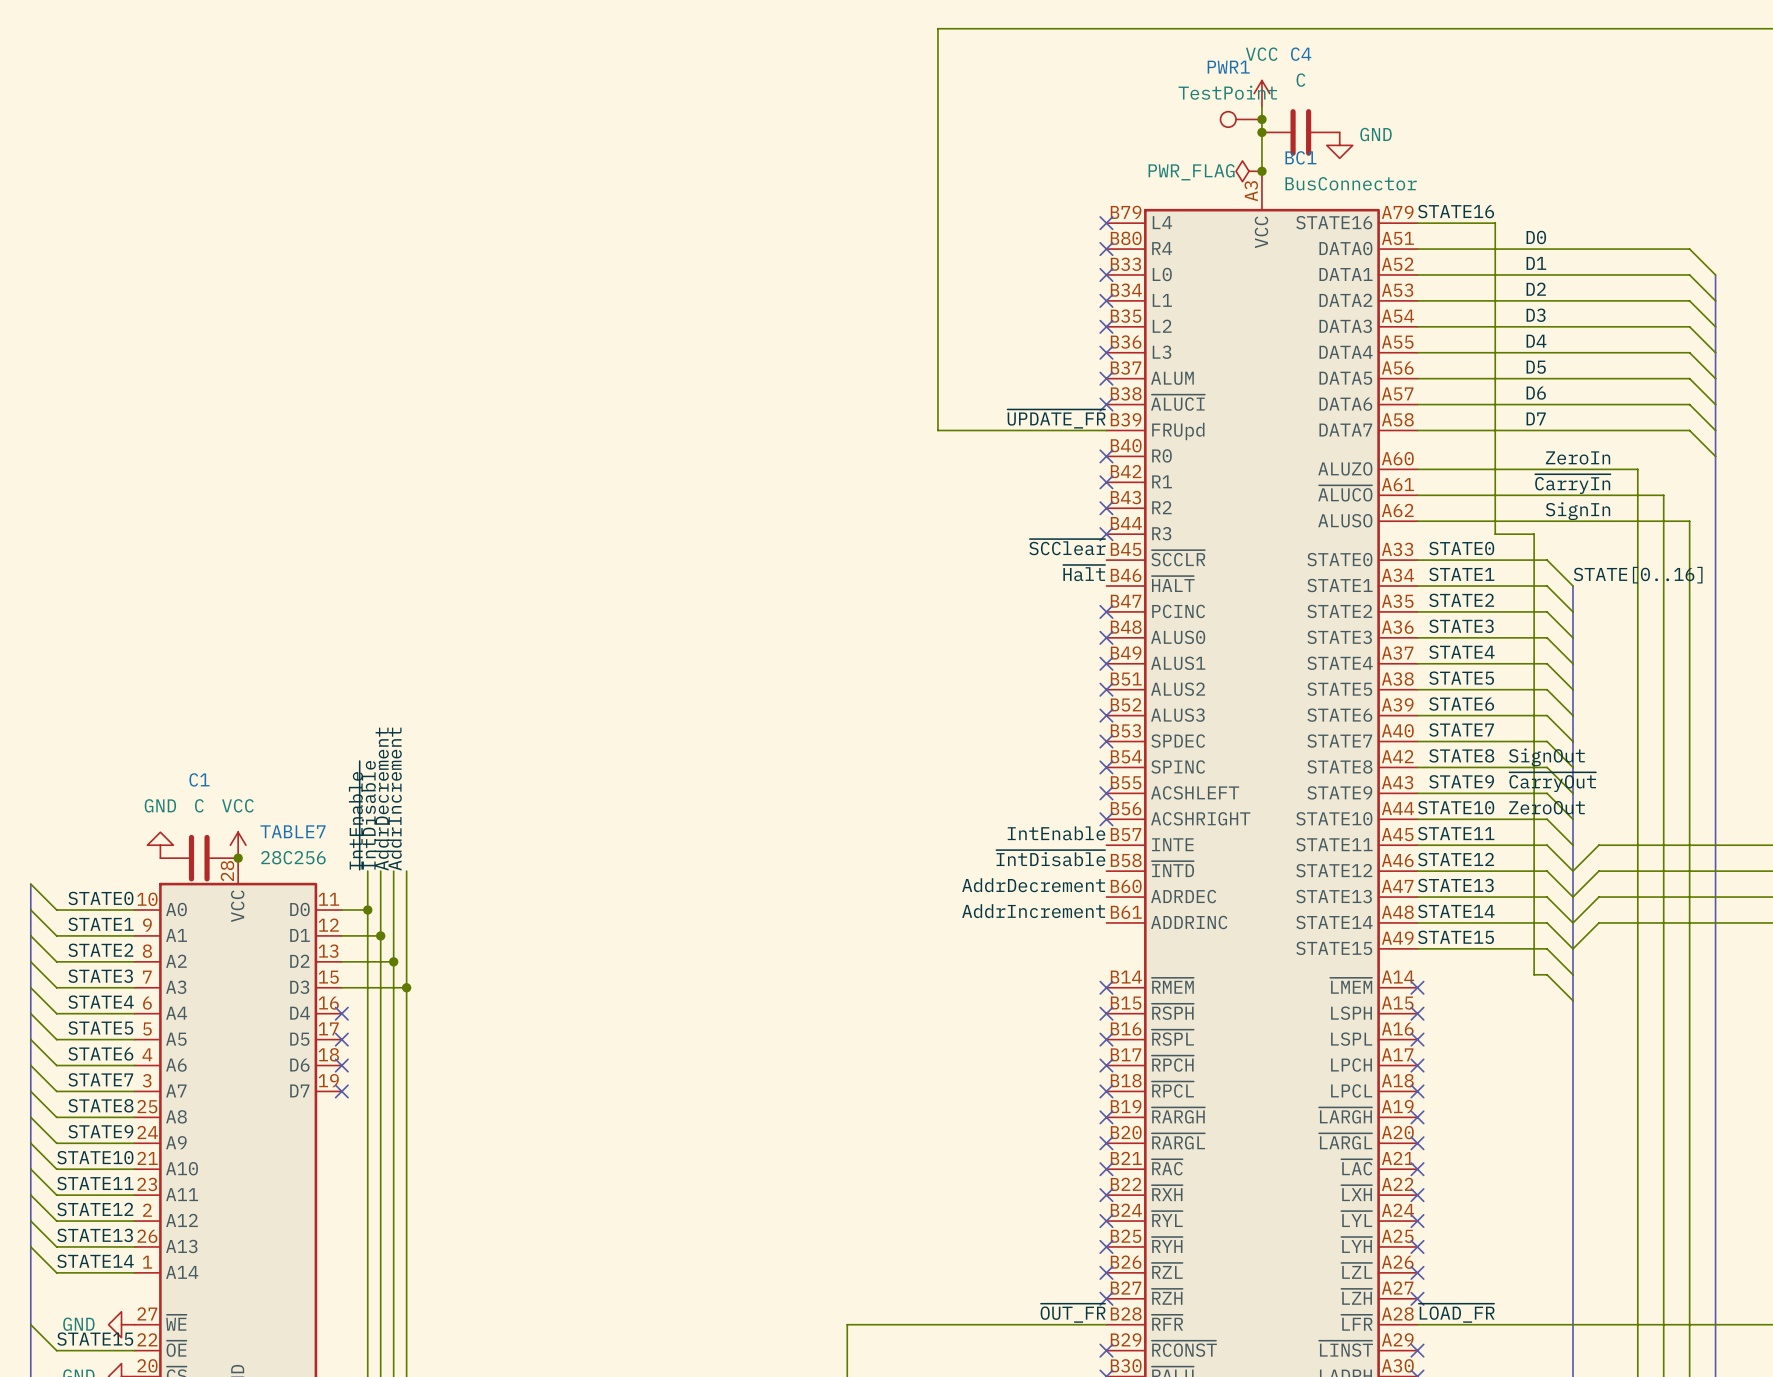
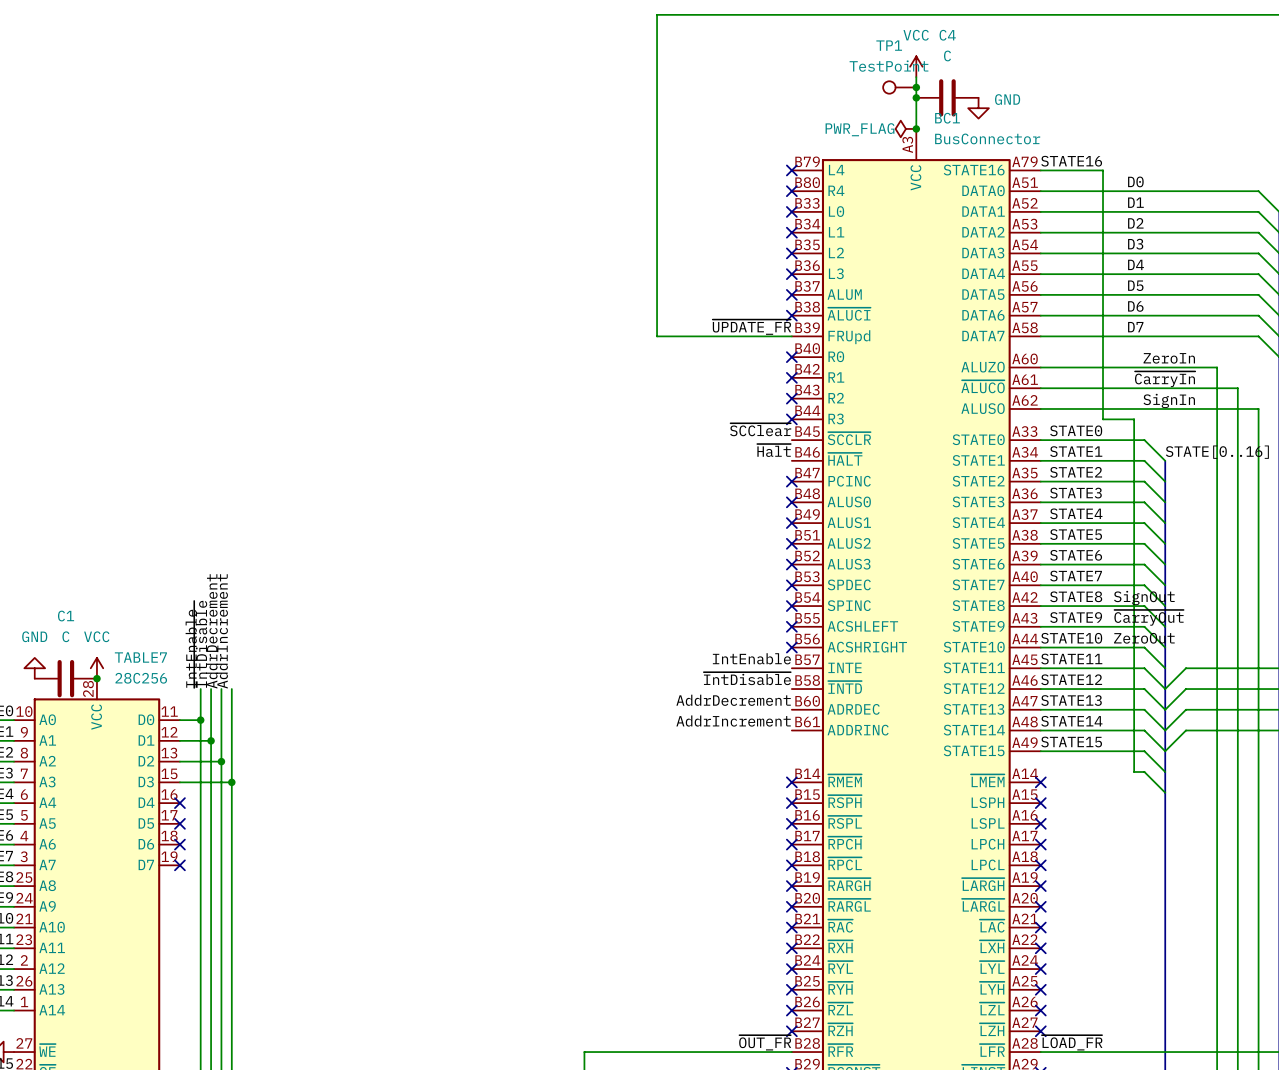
PWR1 name: PWR1 (1228, 67) -> TP1 (889, 45)

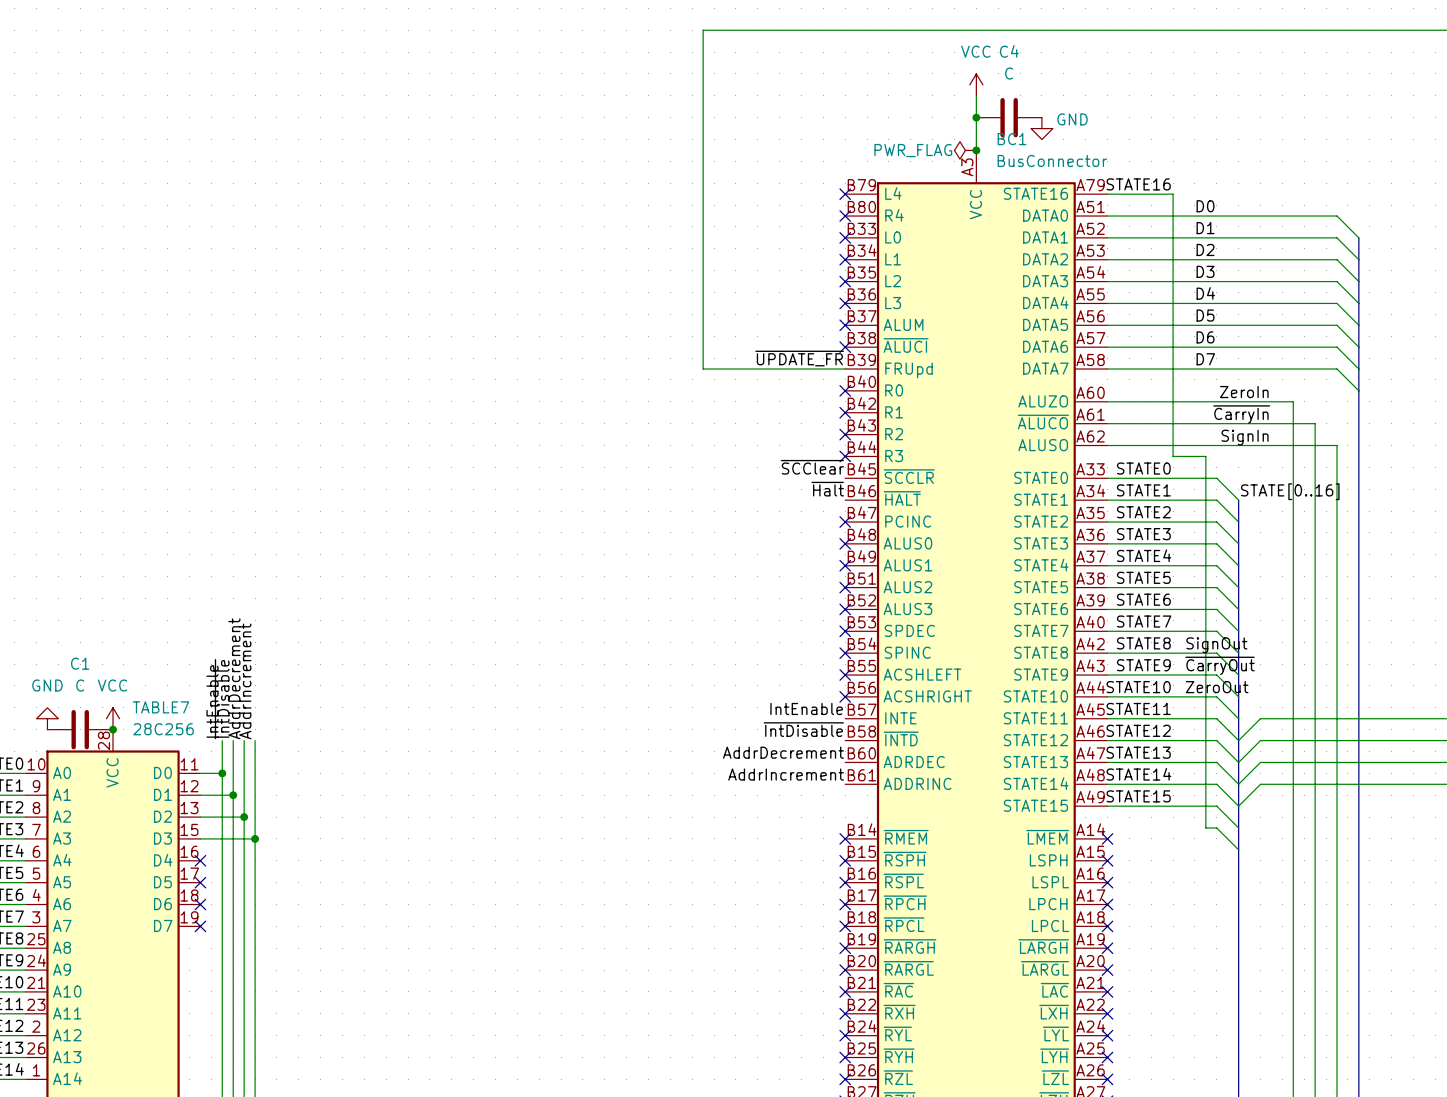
TP1: TestPoint (899, 87) -> none
junction: (916, 87) -> none

